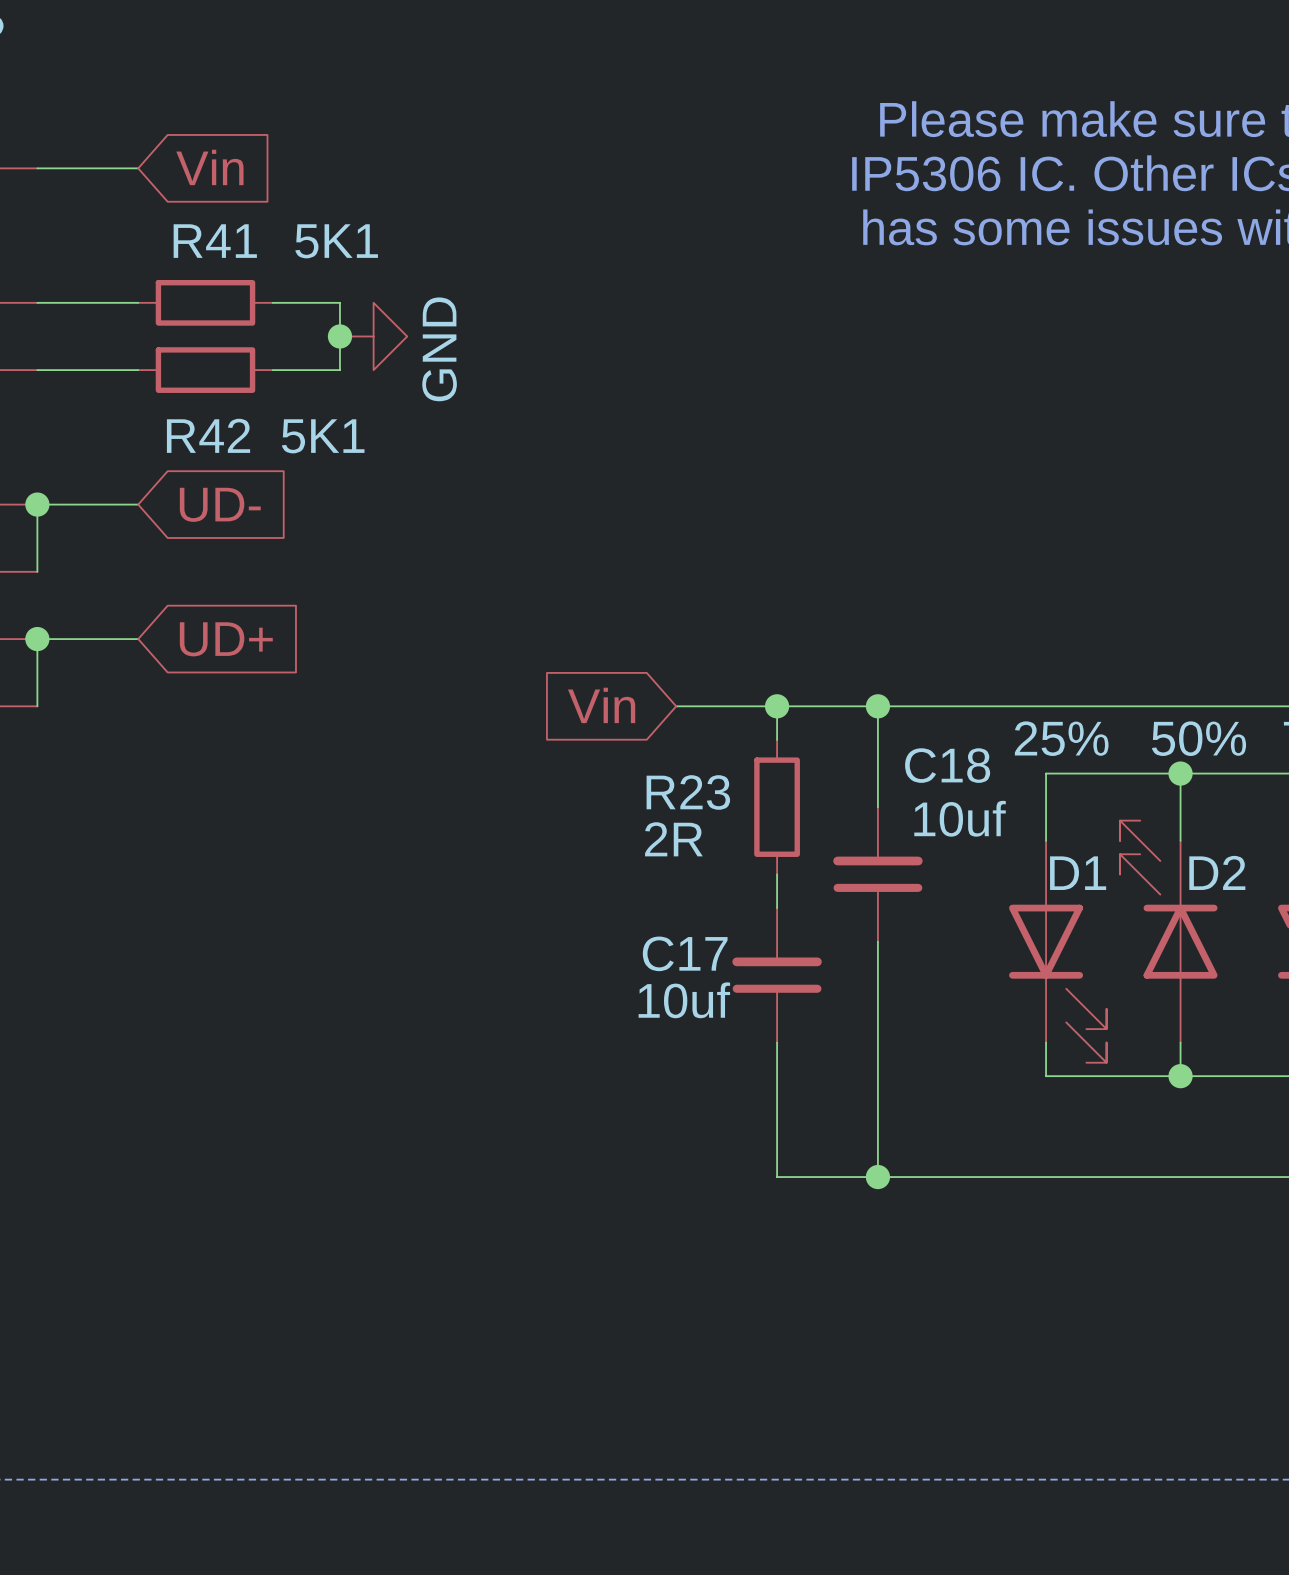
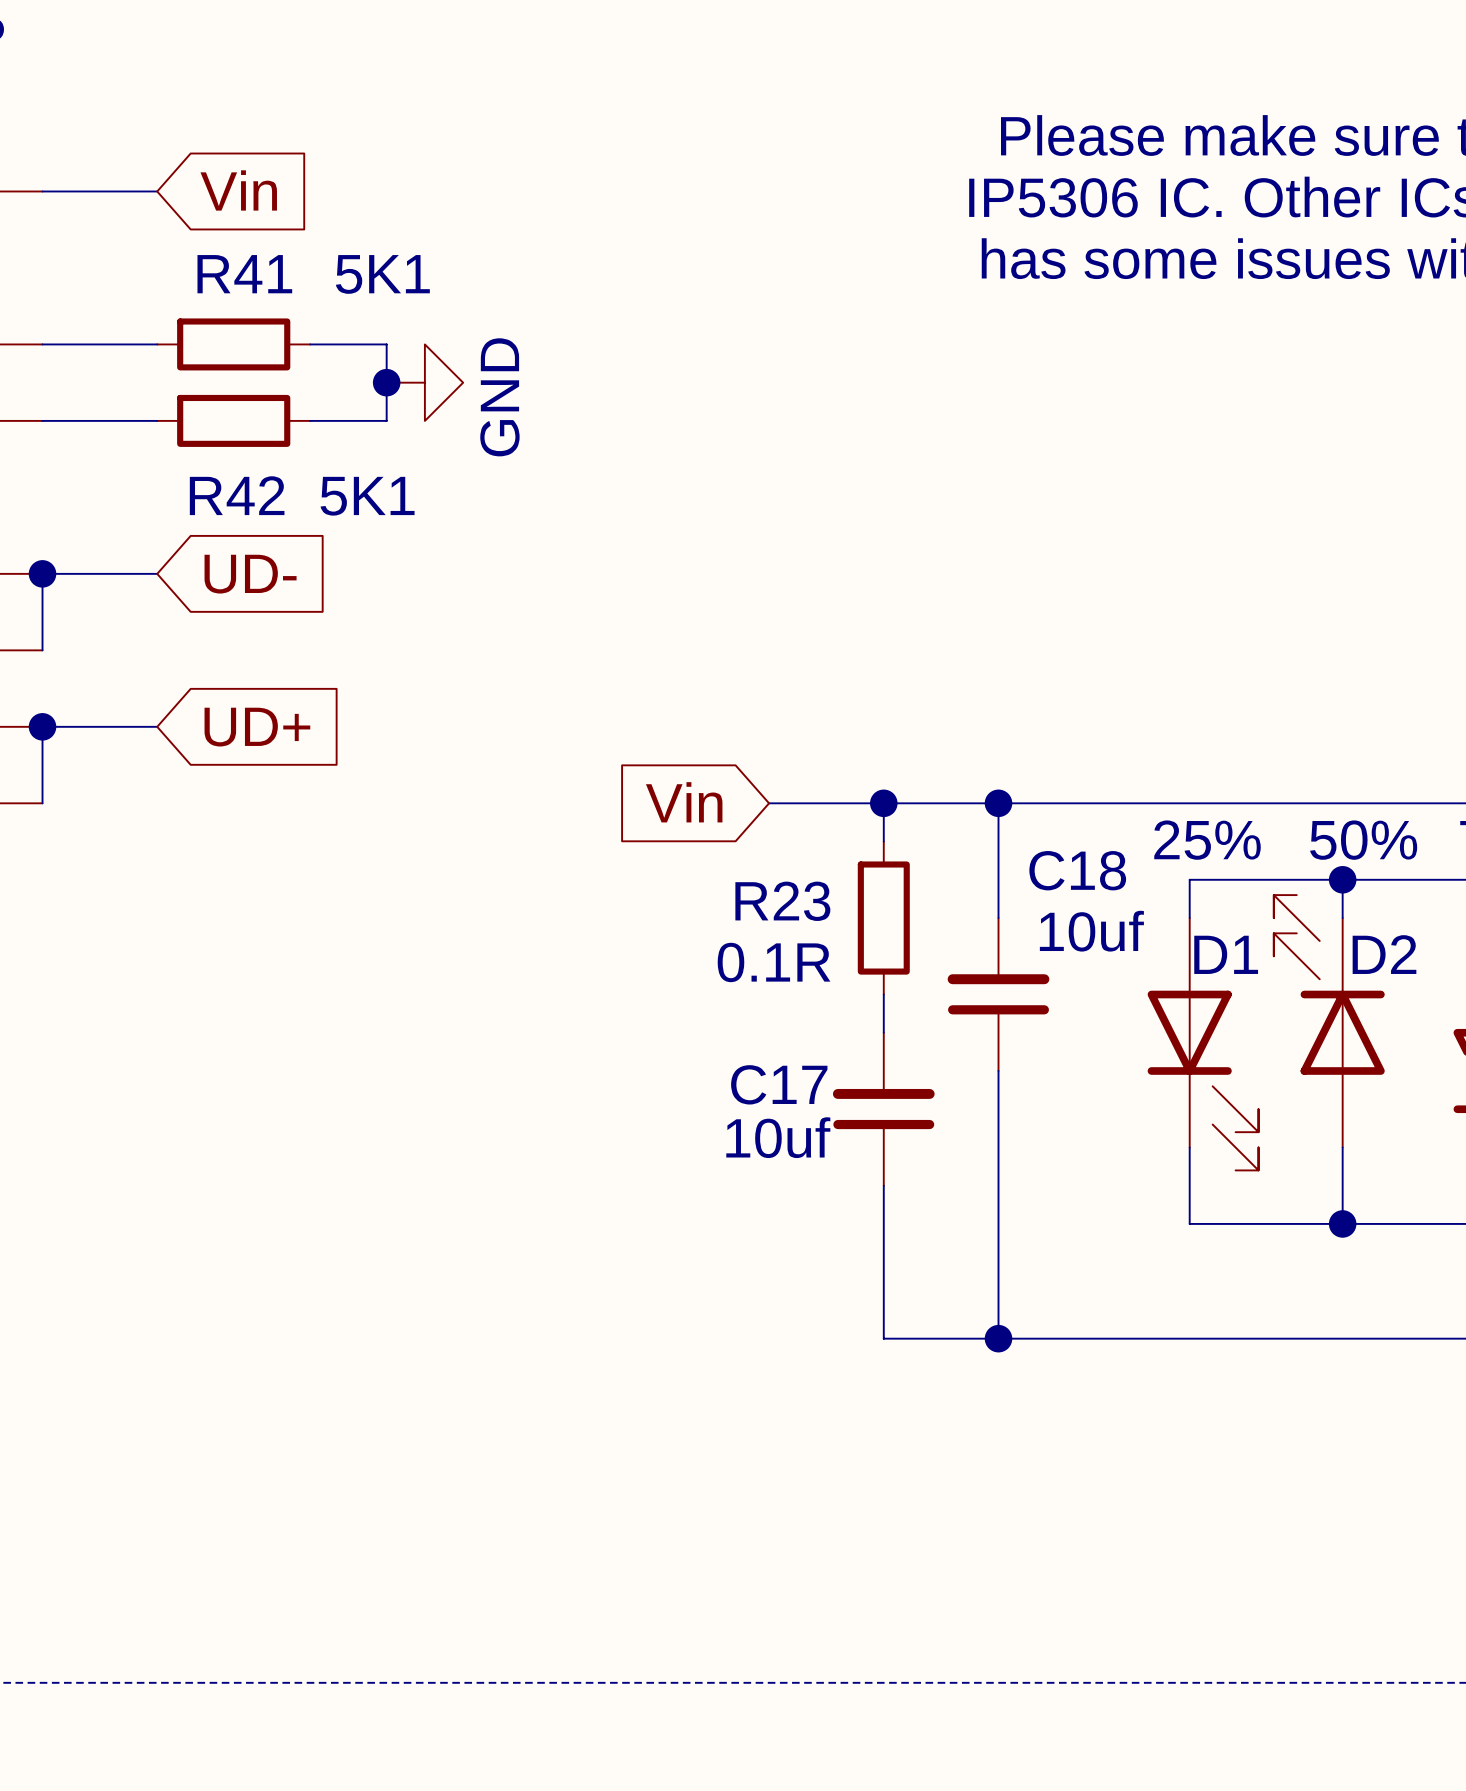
R23 value: 2R (673, 839) -> 0.1R (774, 962)
D2 position: (1168, 931) -> (1329, 1021)
D1 position: (1057, 951) -> (1203, 1044)

